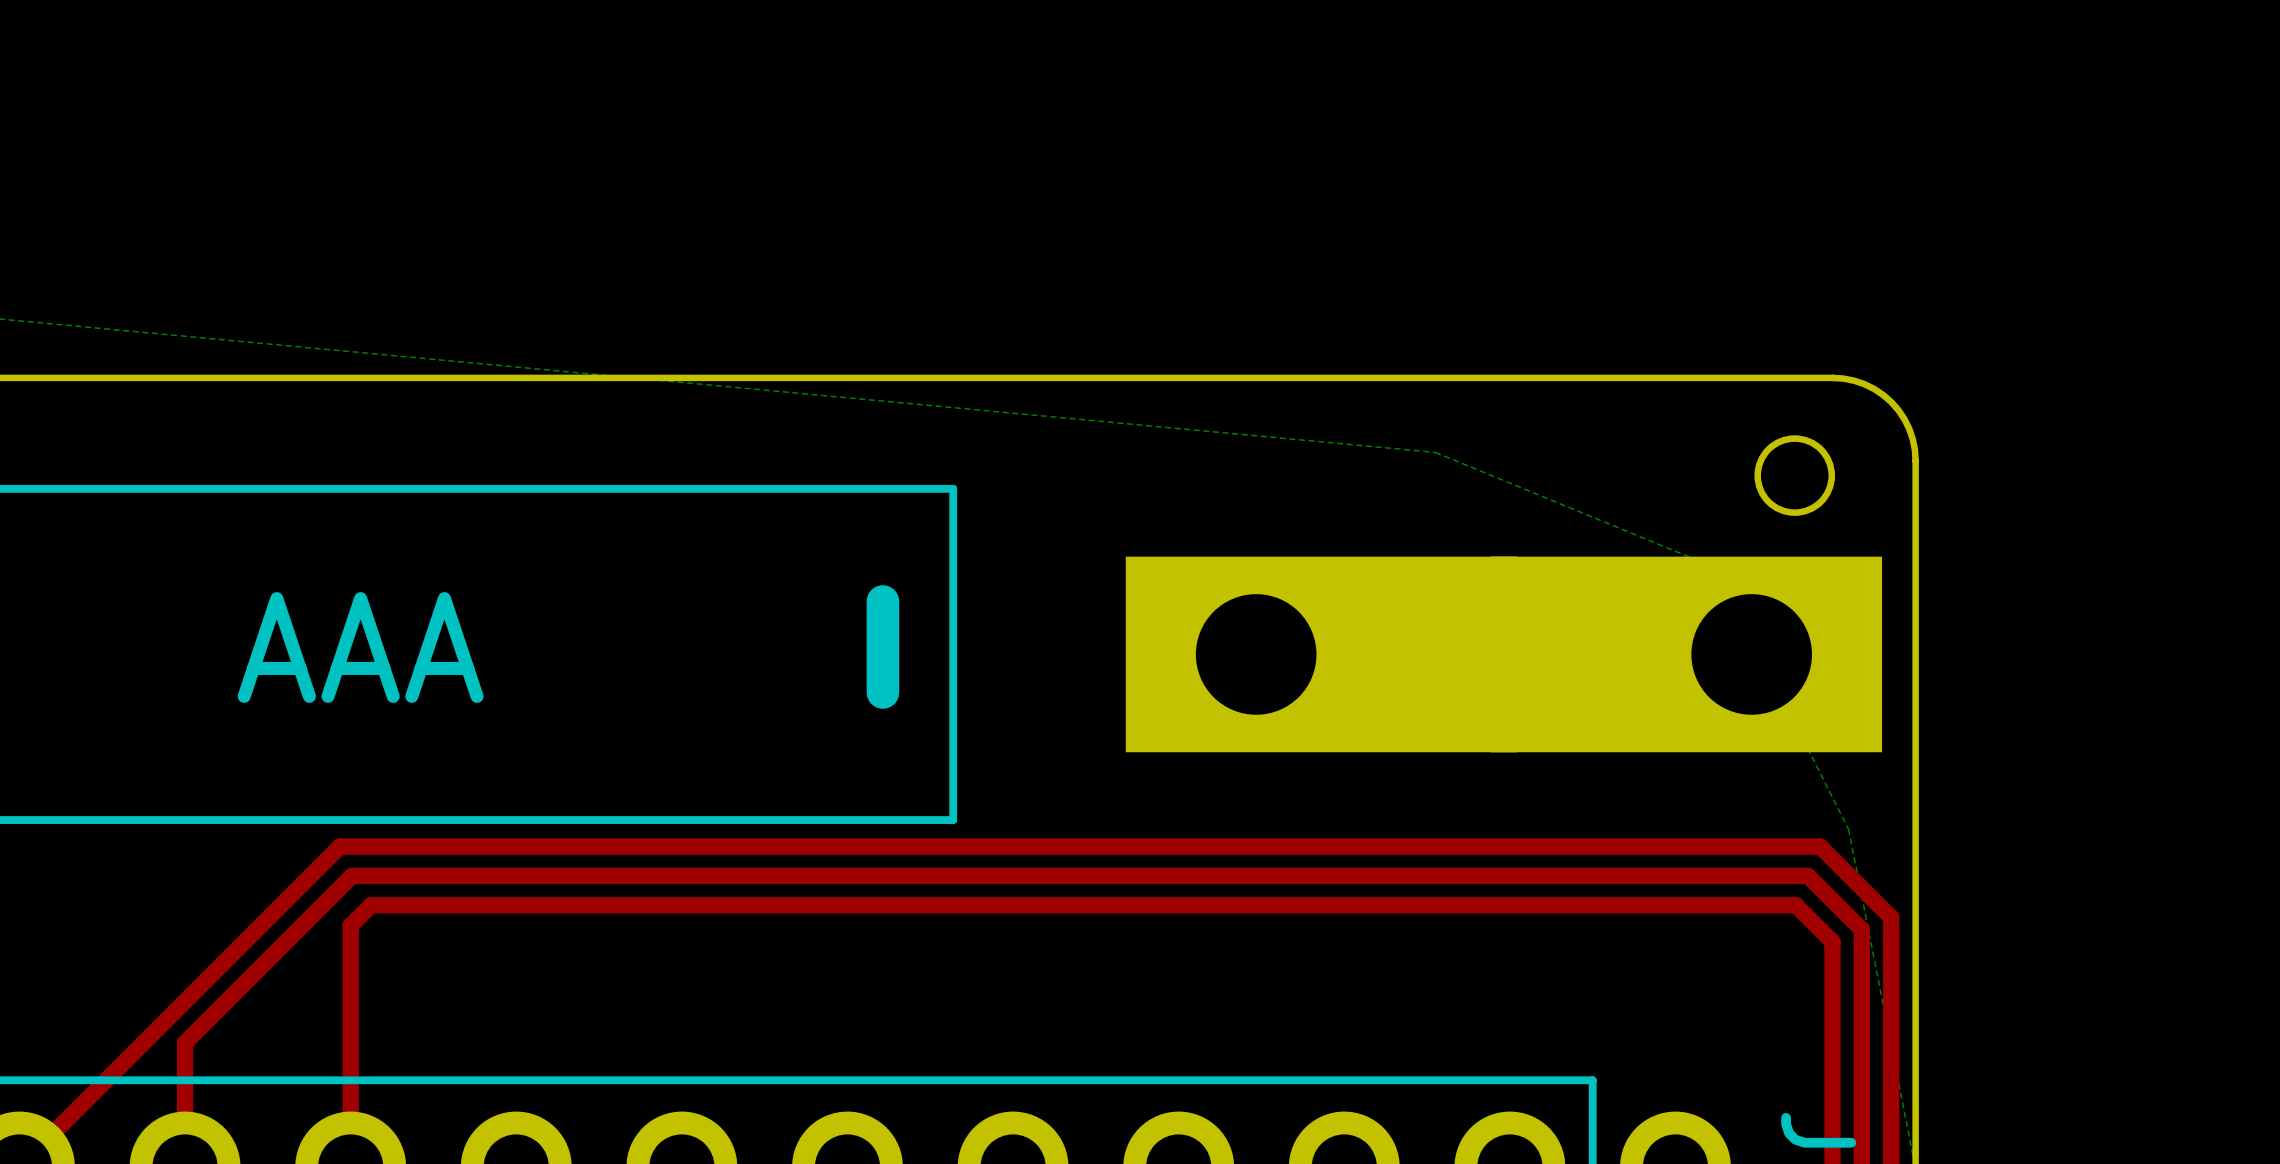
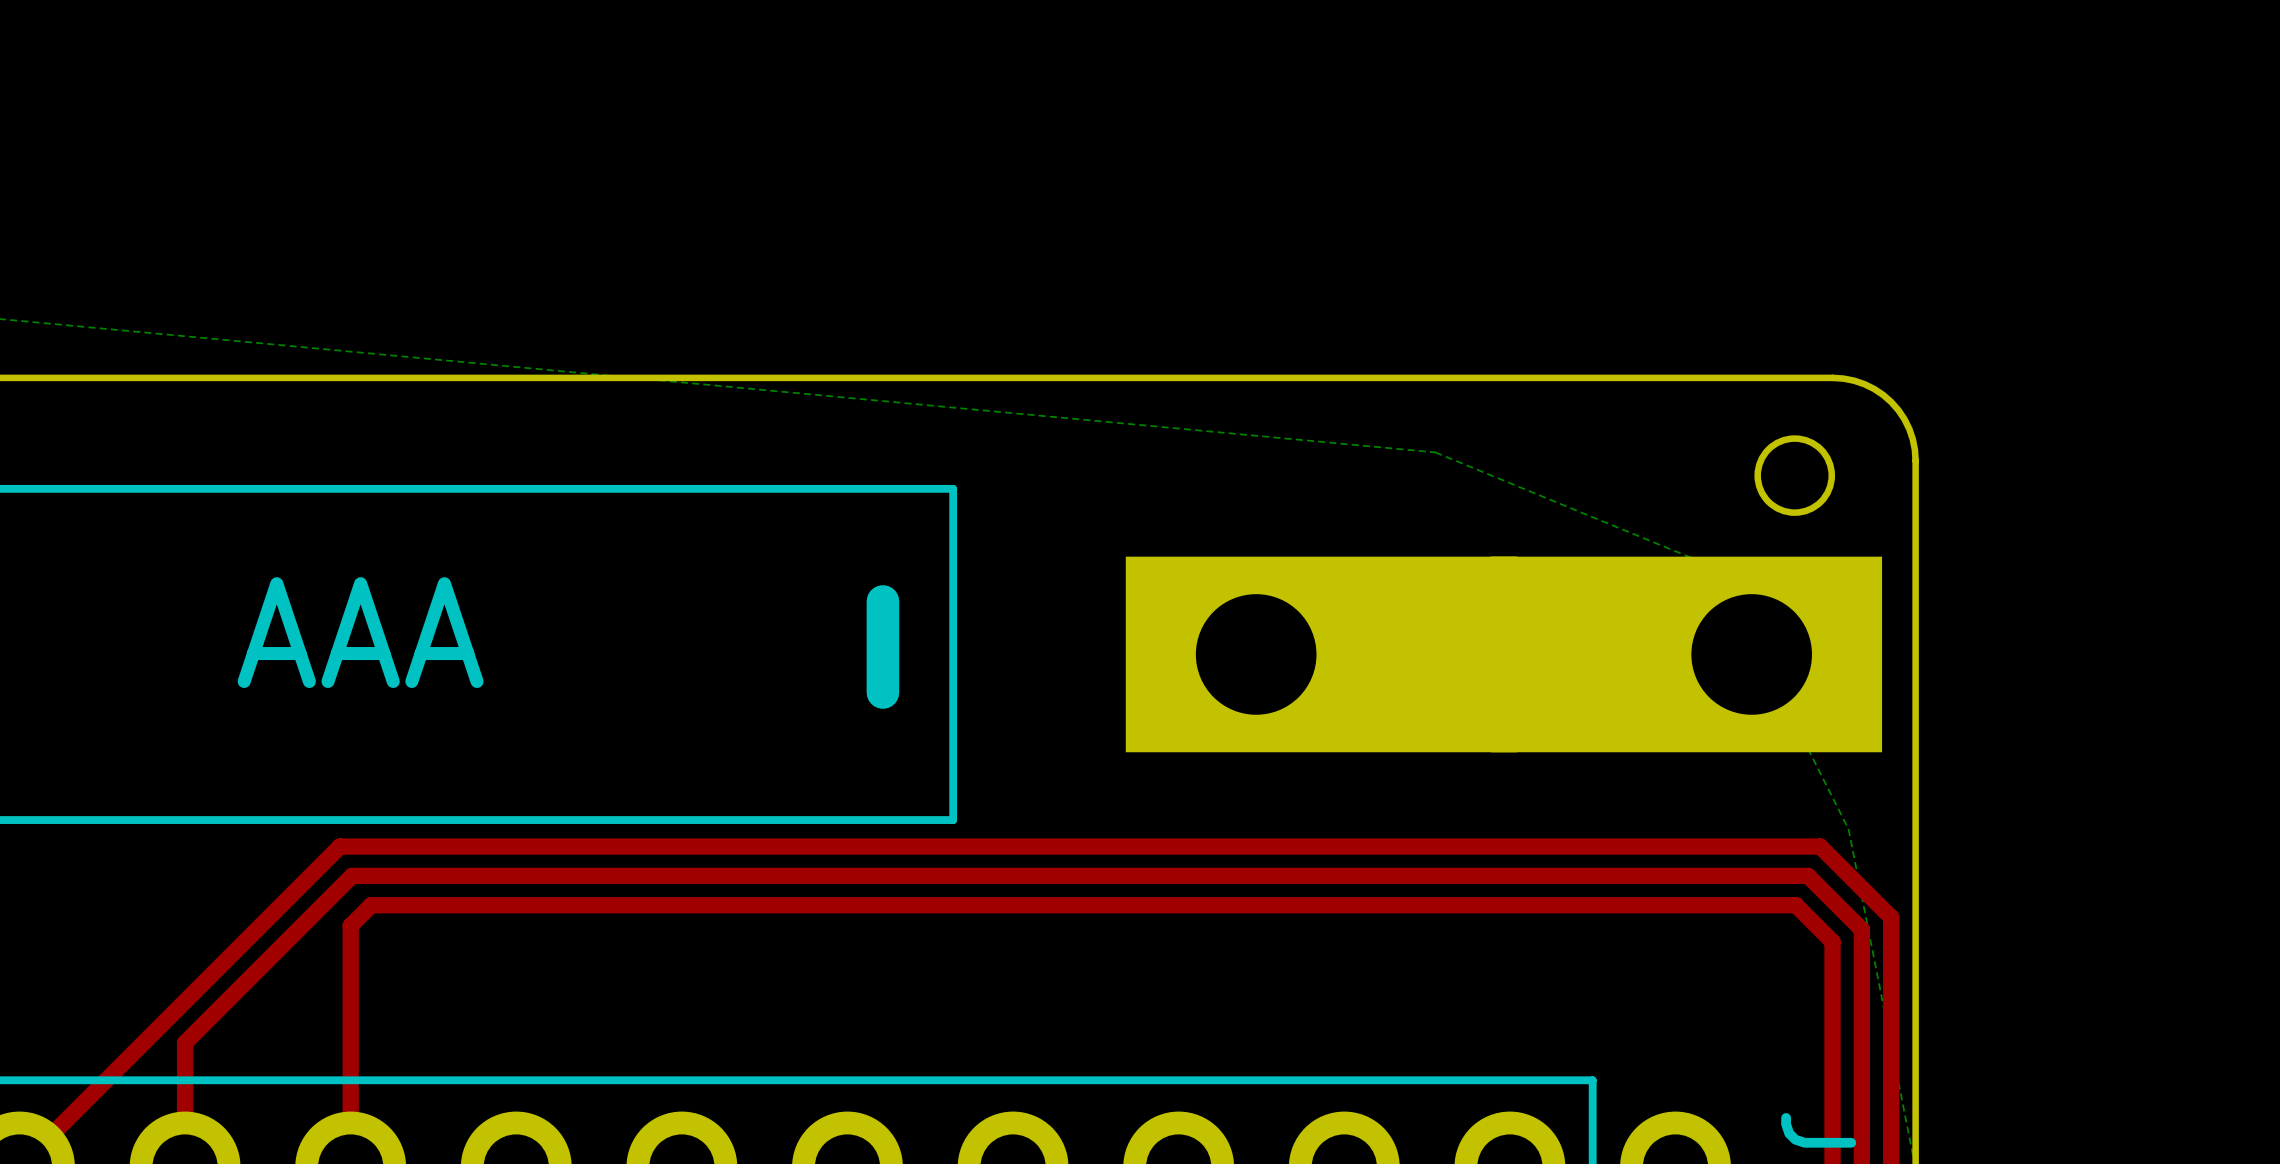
text position: AAA (360, 647) -> AAA (360, 632)

